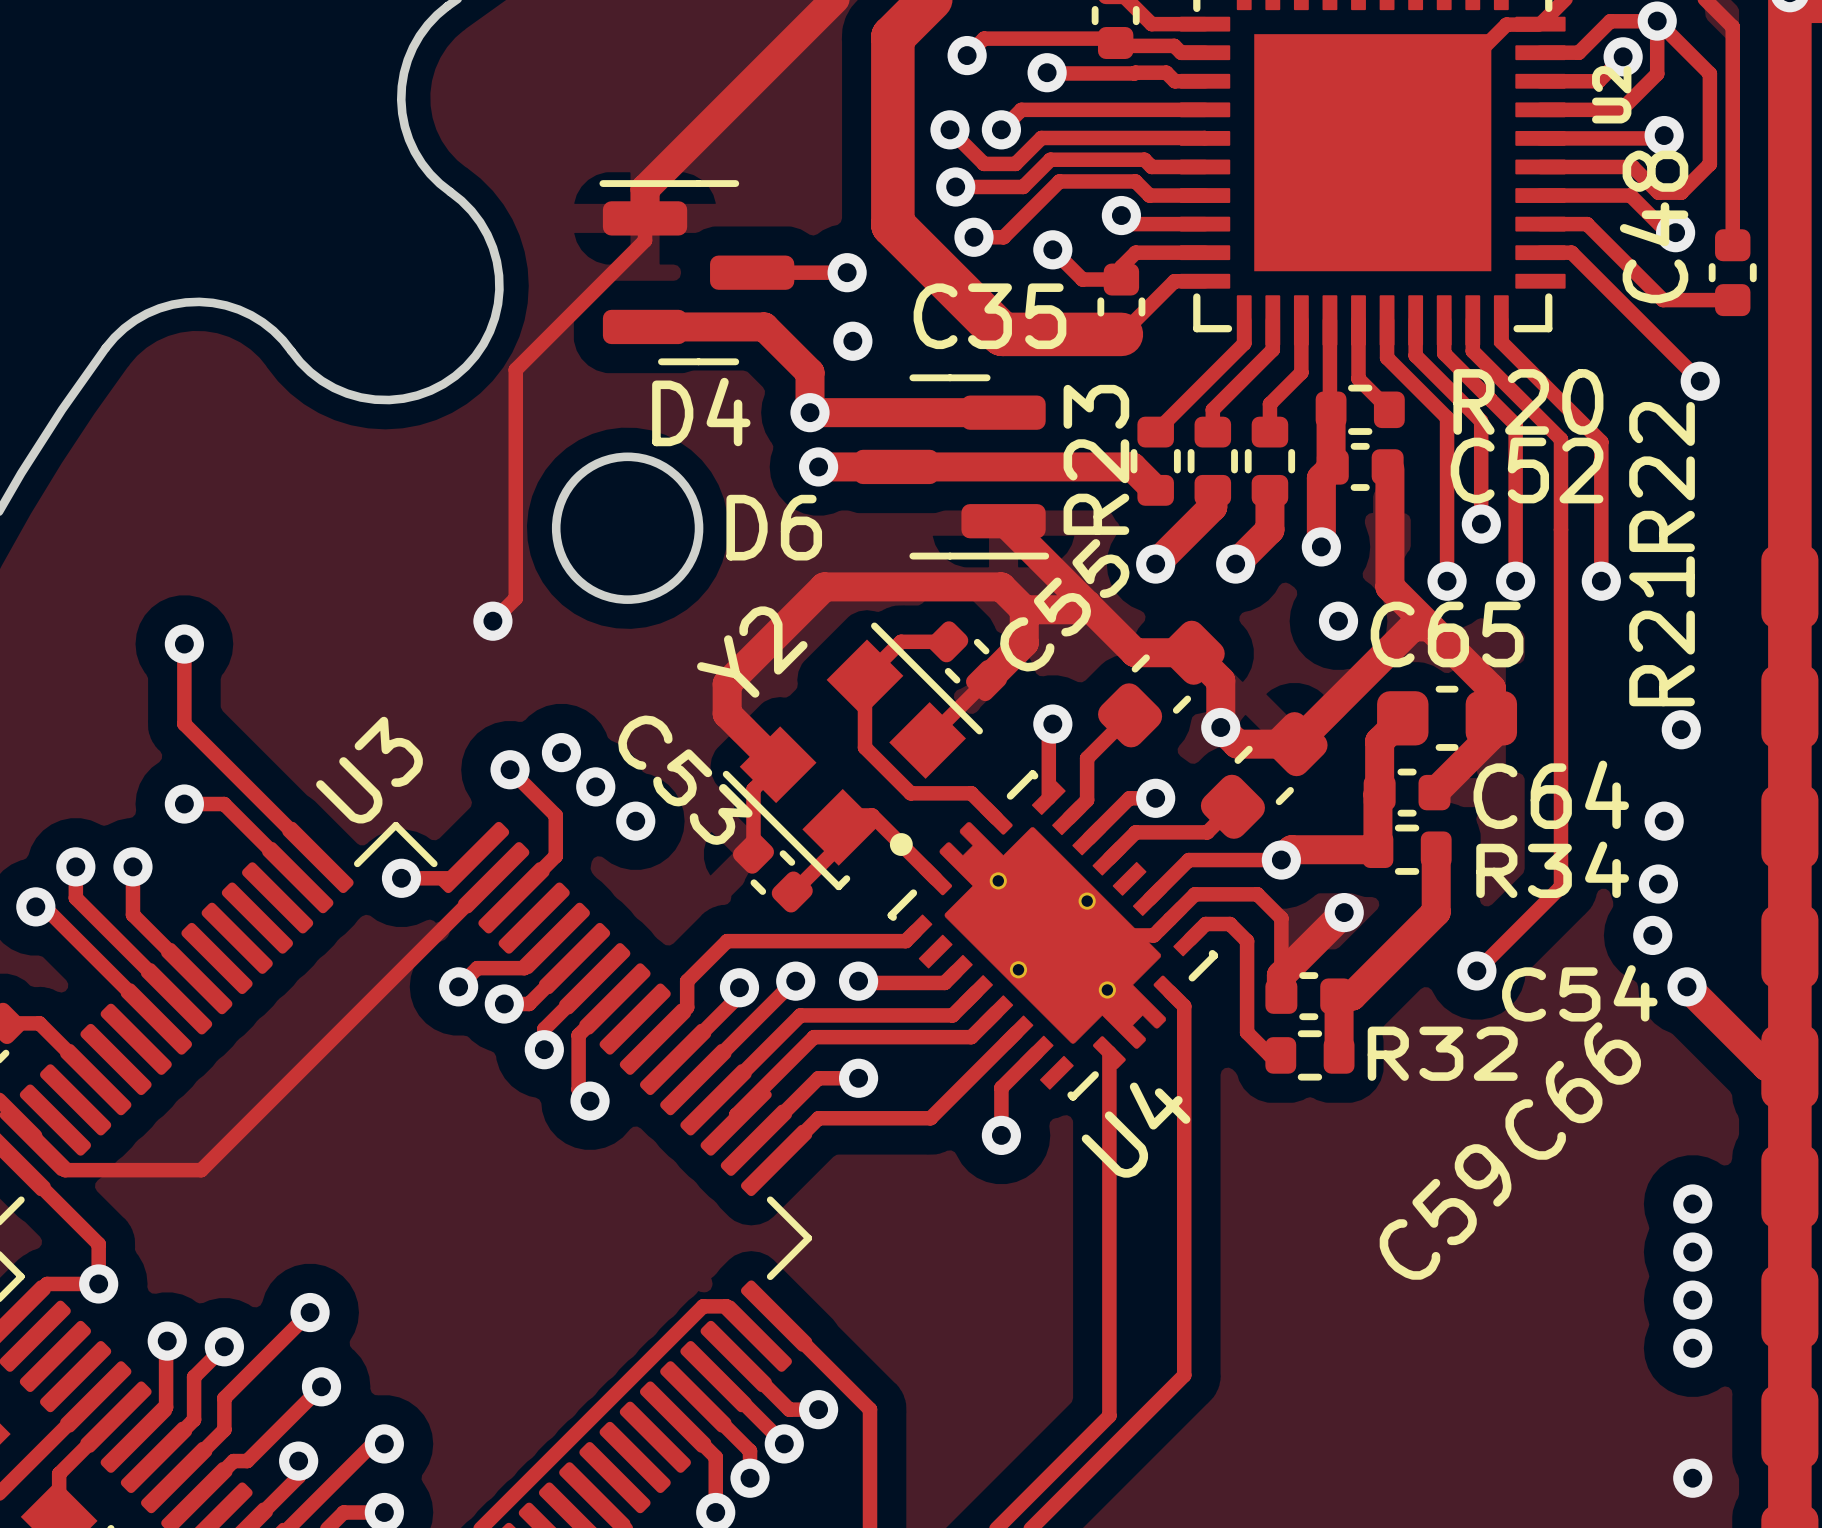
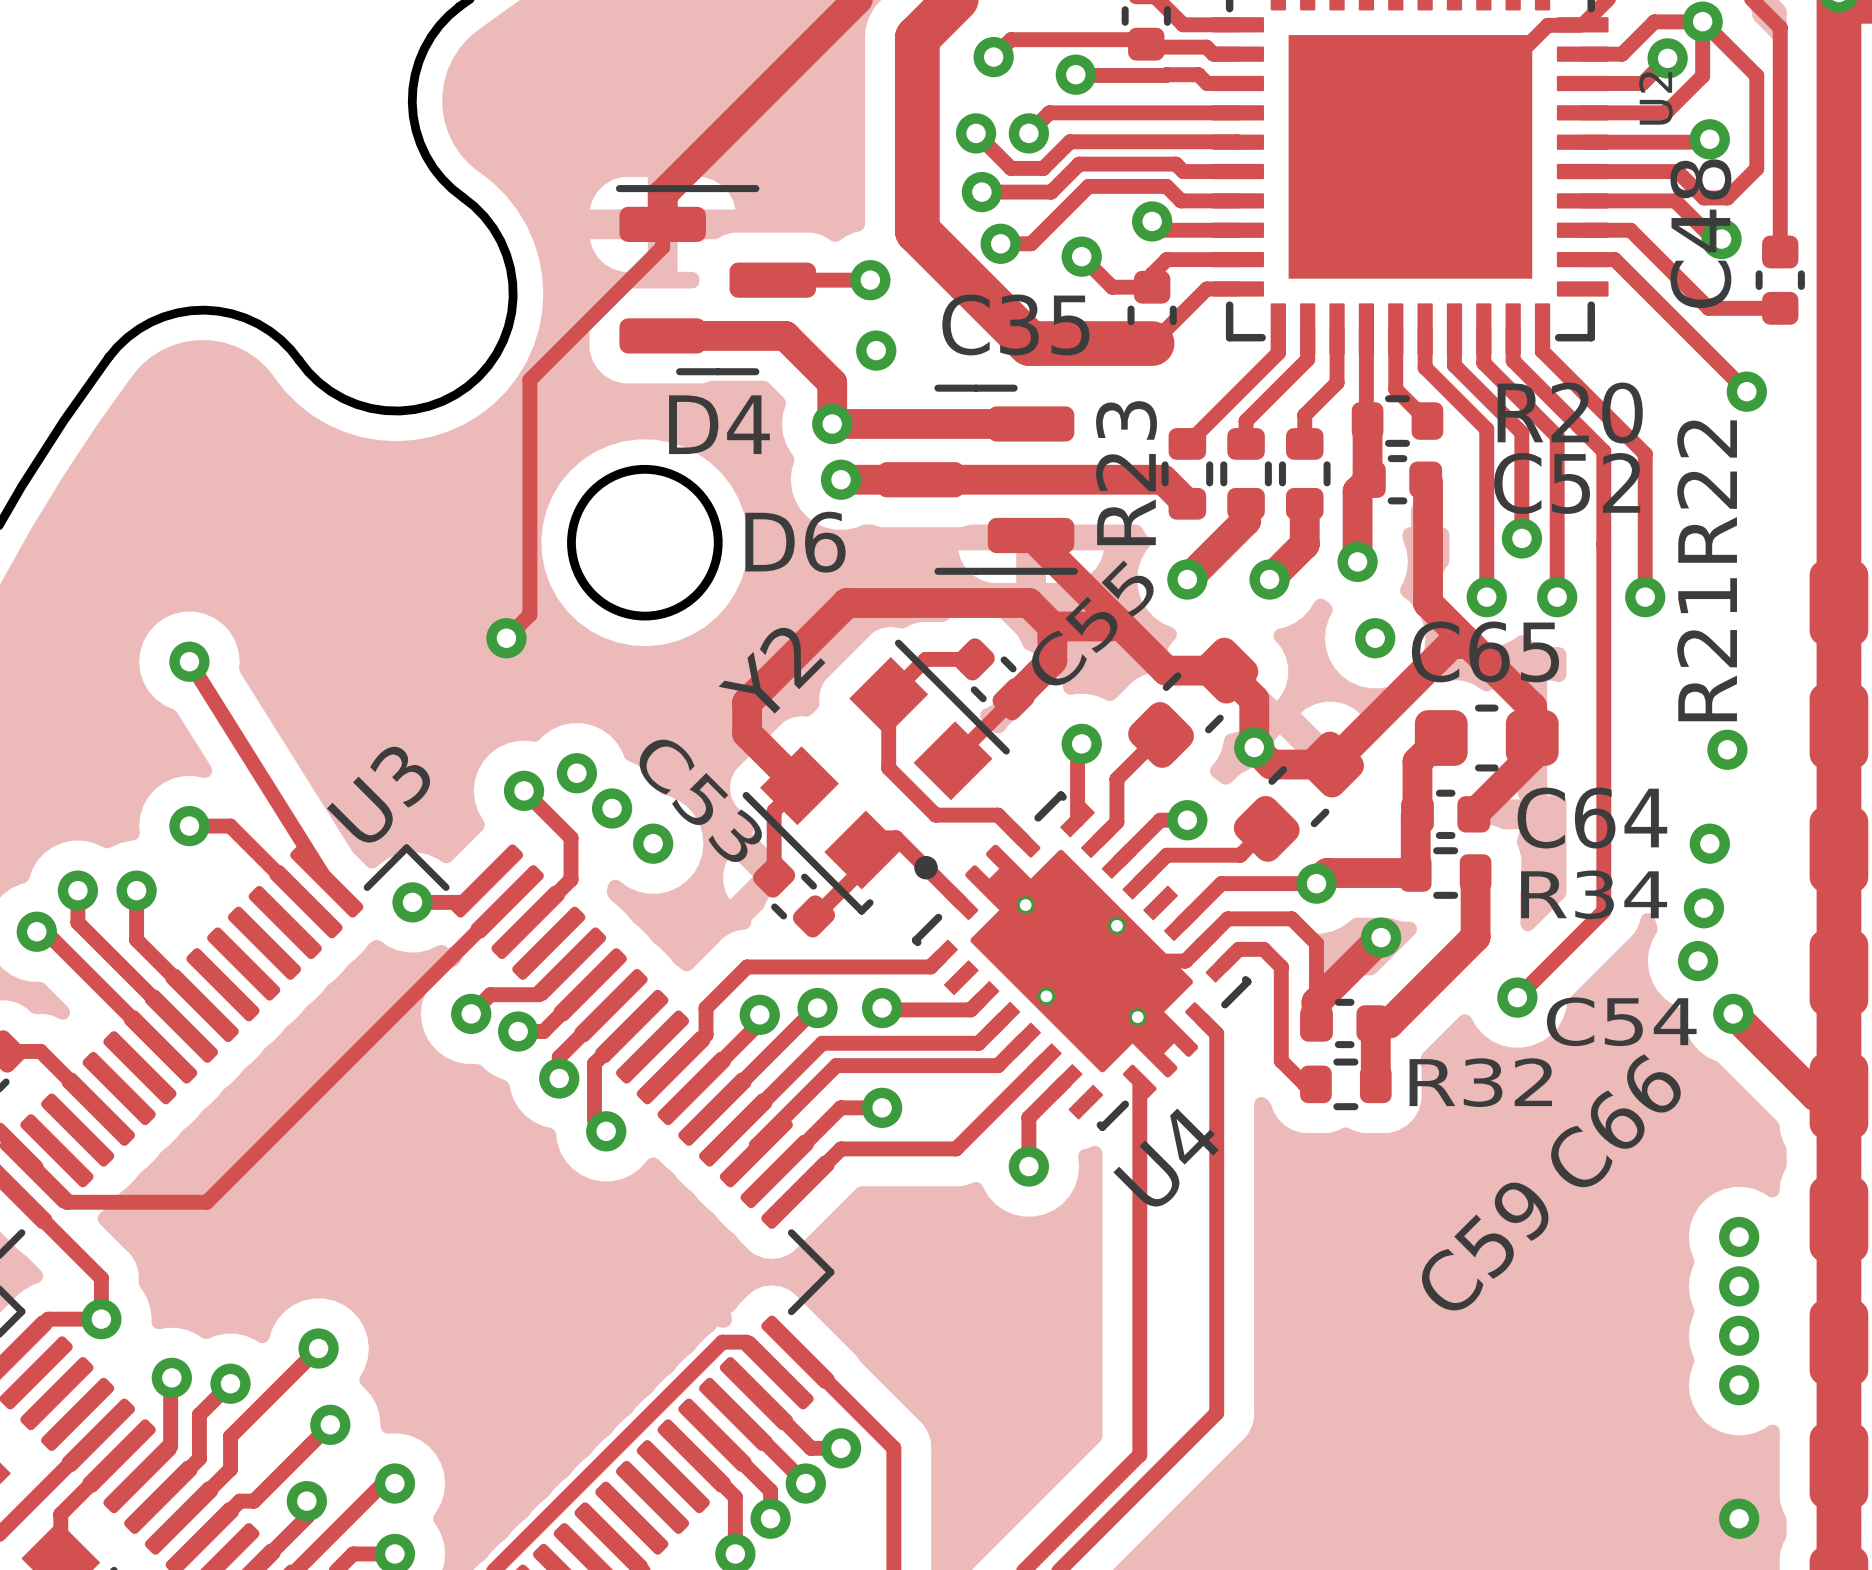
track: (184, 644) (184, 724) (317, 857) -> (189, 661) (326, 880)

